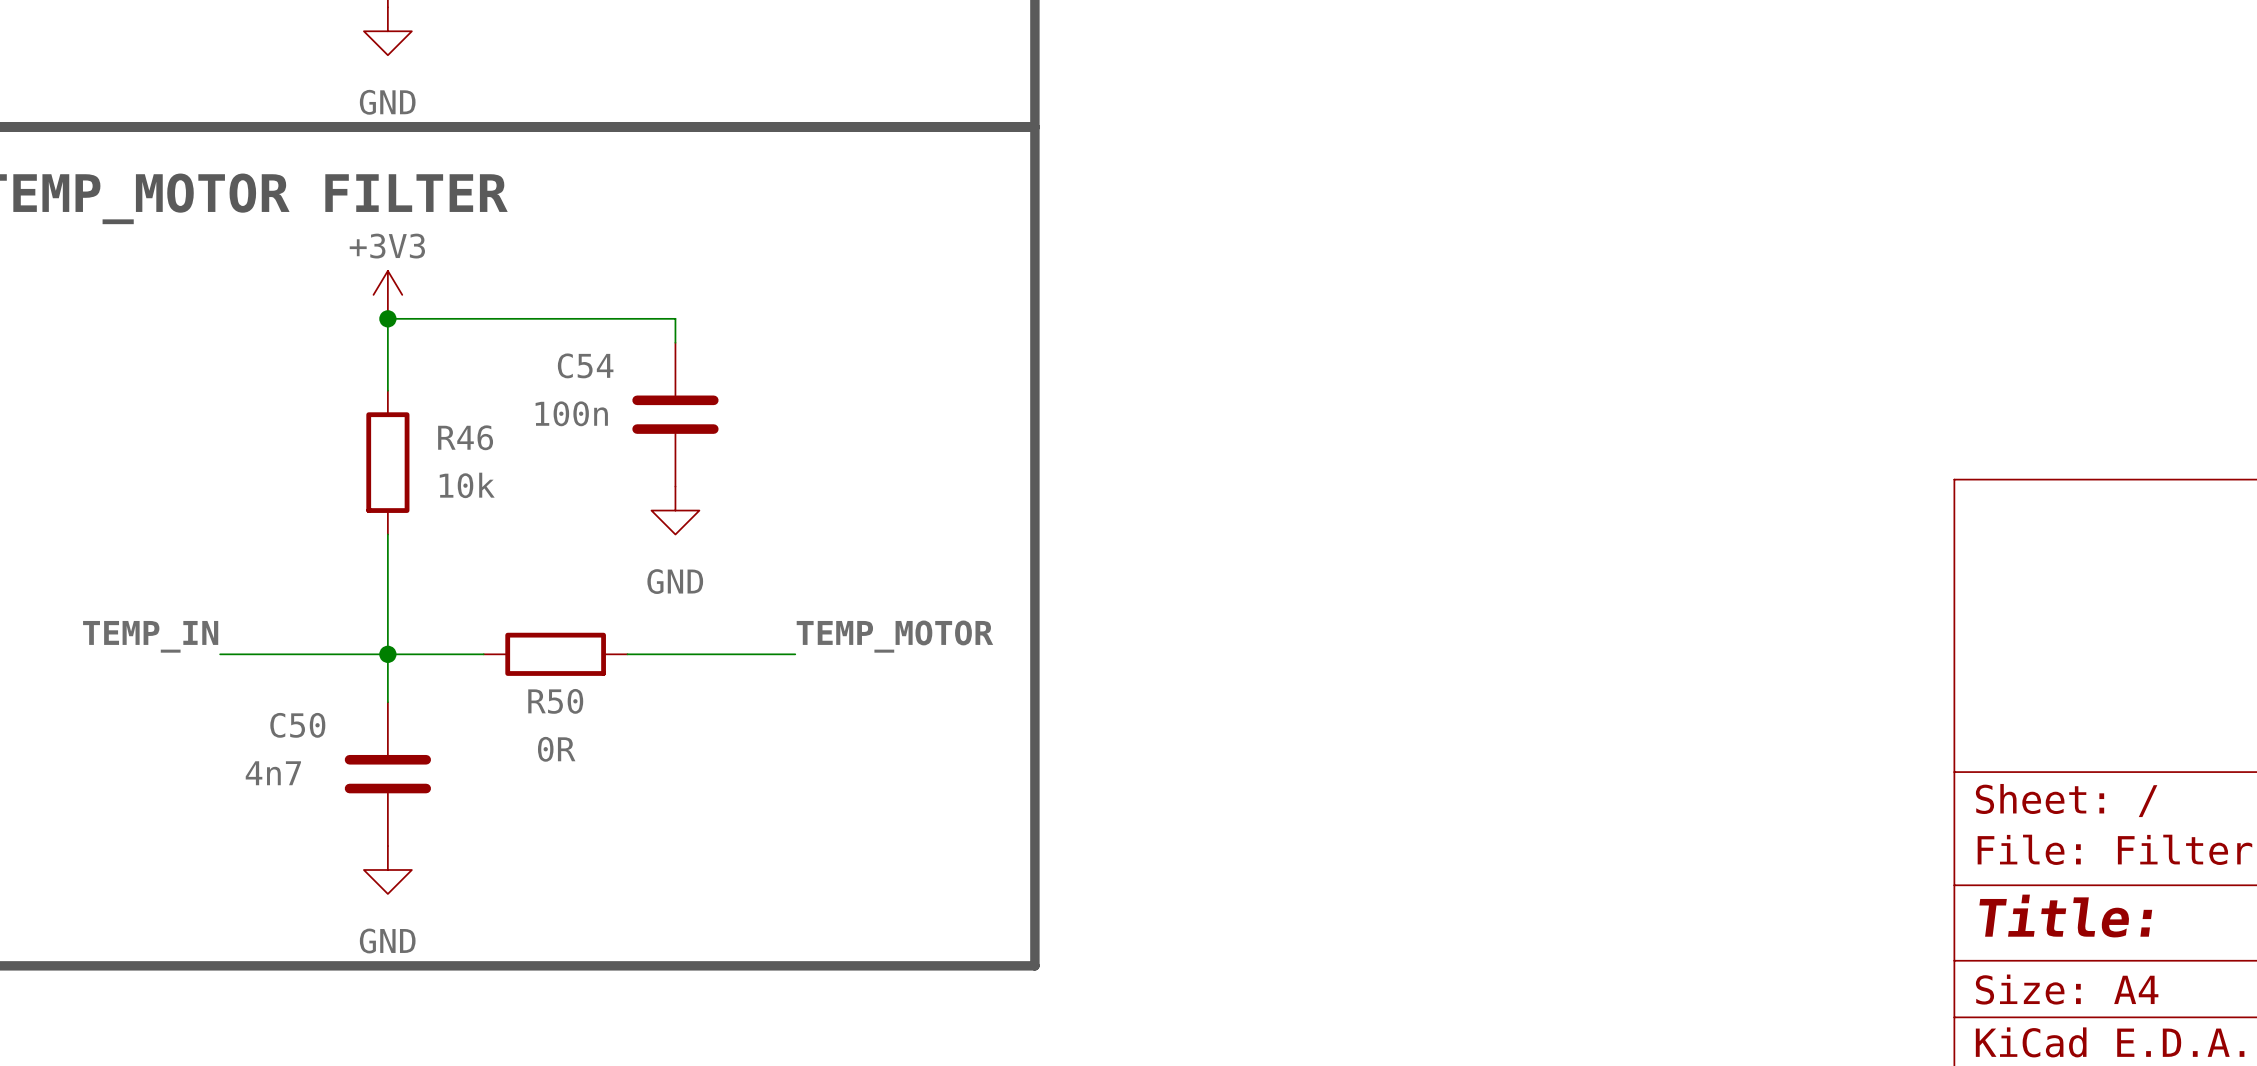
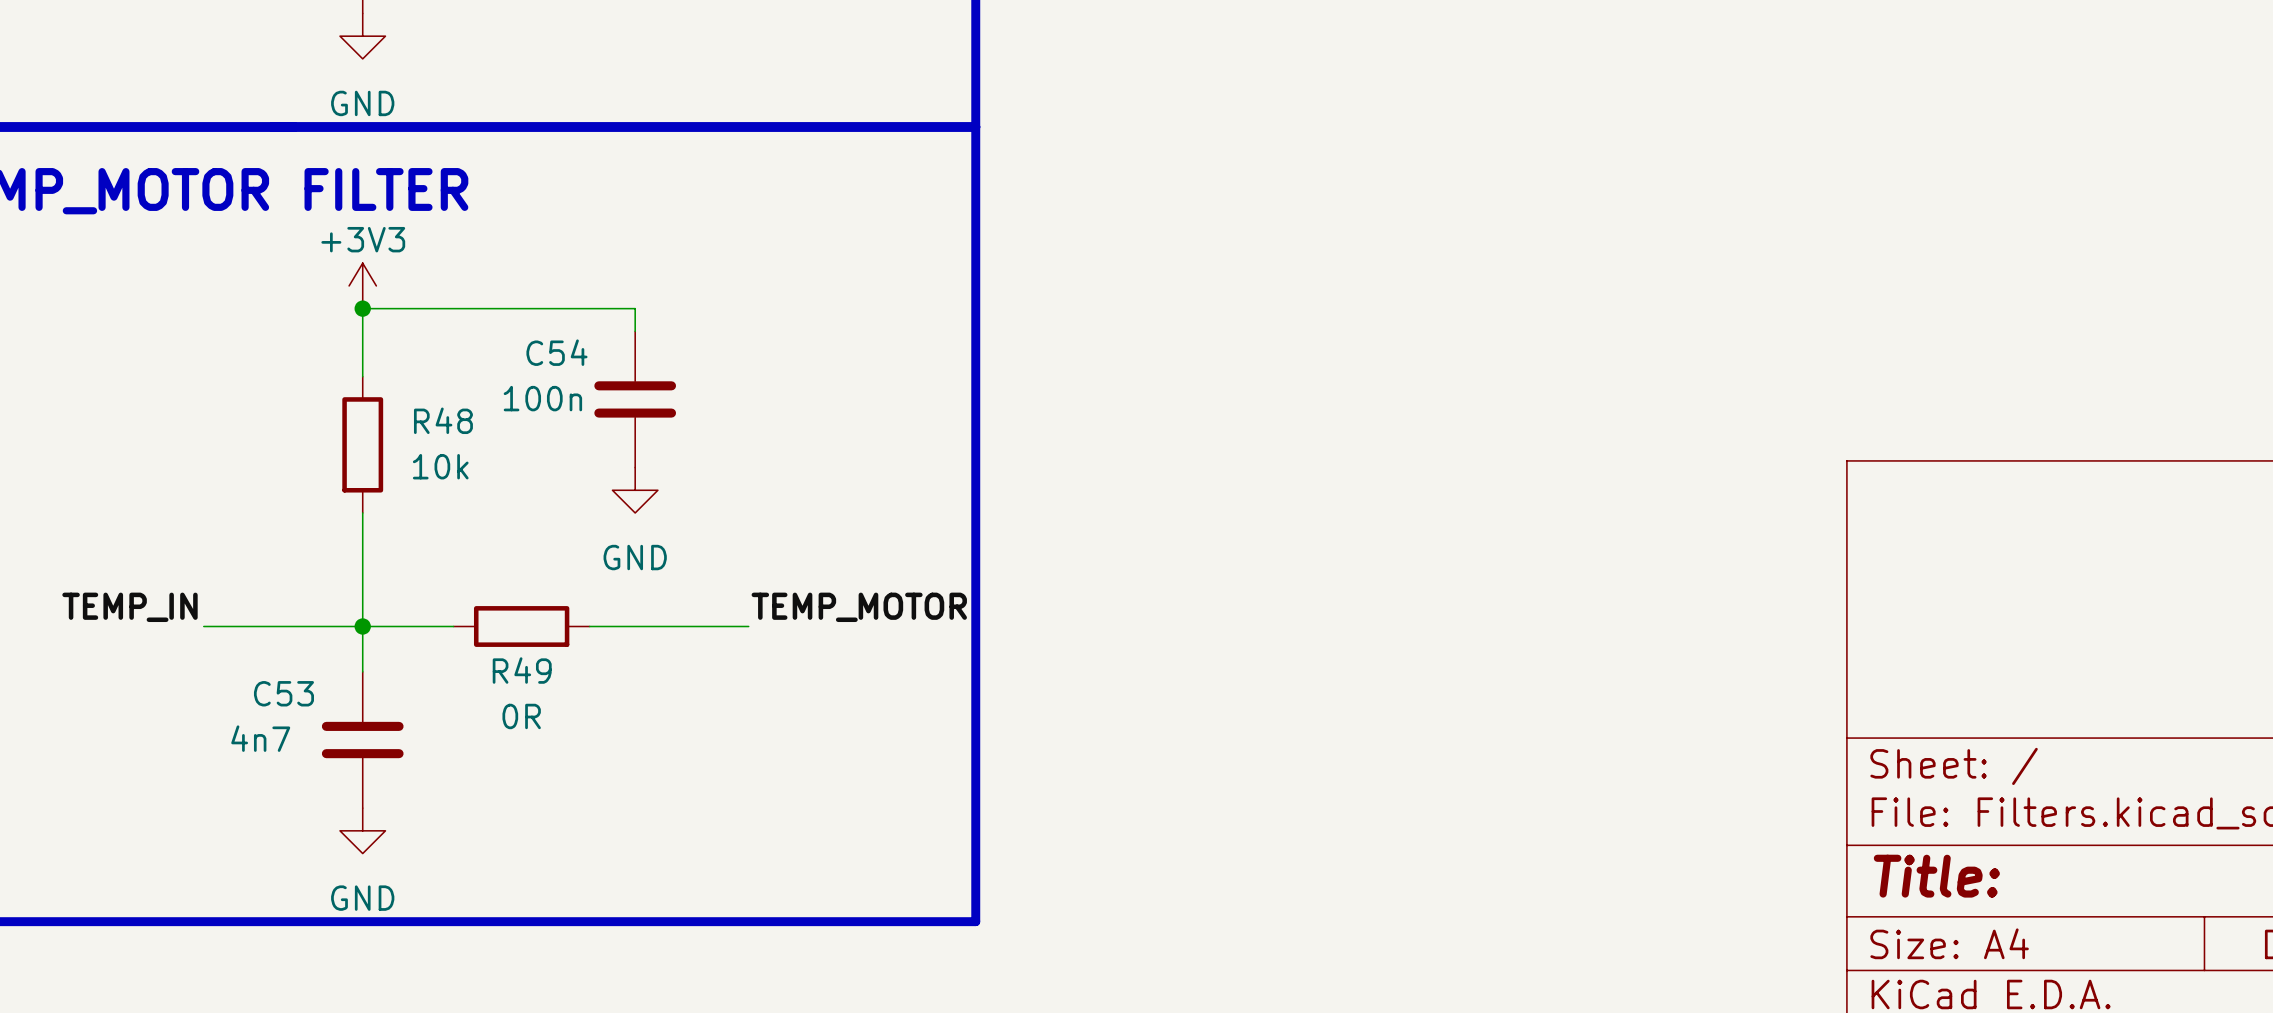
R46 name: R46 (465, 437) -> R48 (443, 420)
R50 name: R50 (555, 701) -> R49 (522, 670)
C50 name: C50 (297, 725) -> C53 (283, 693)

